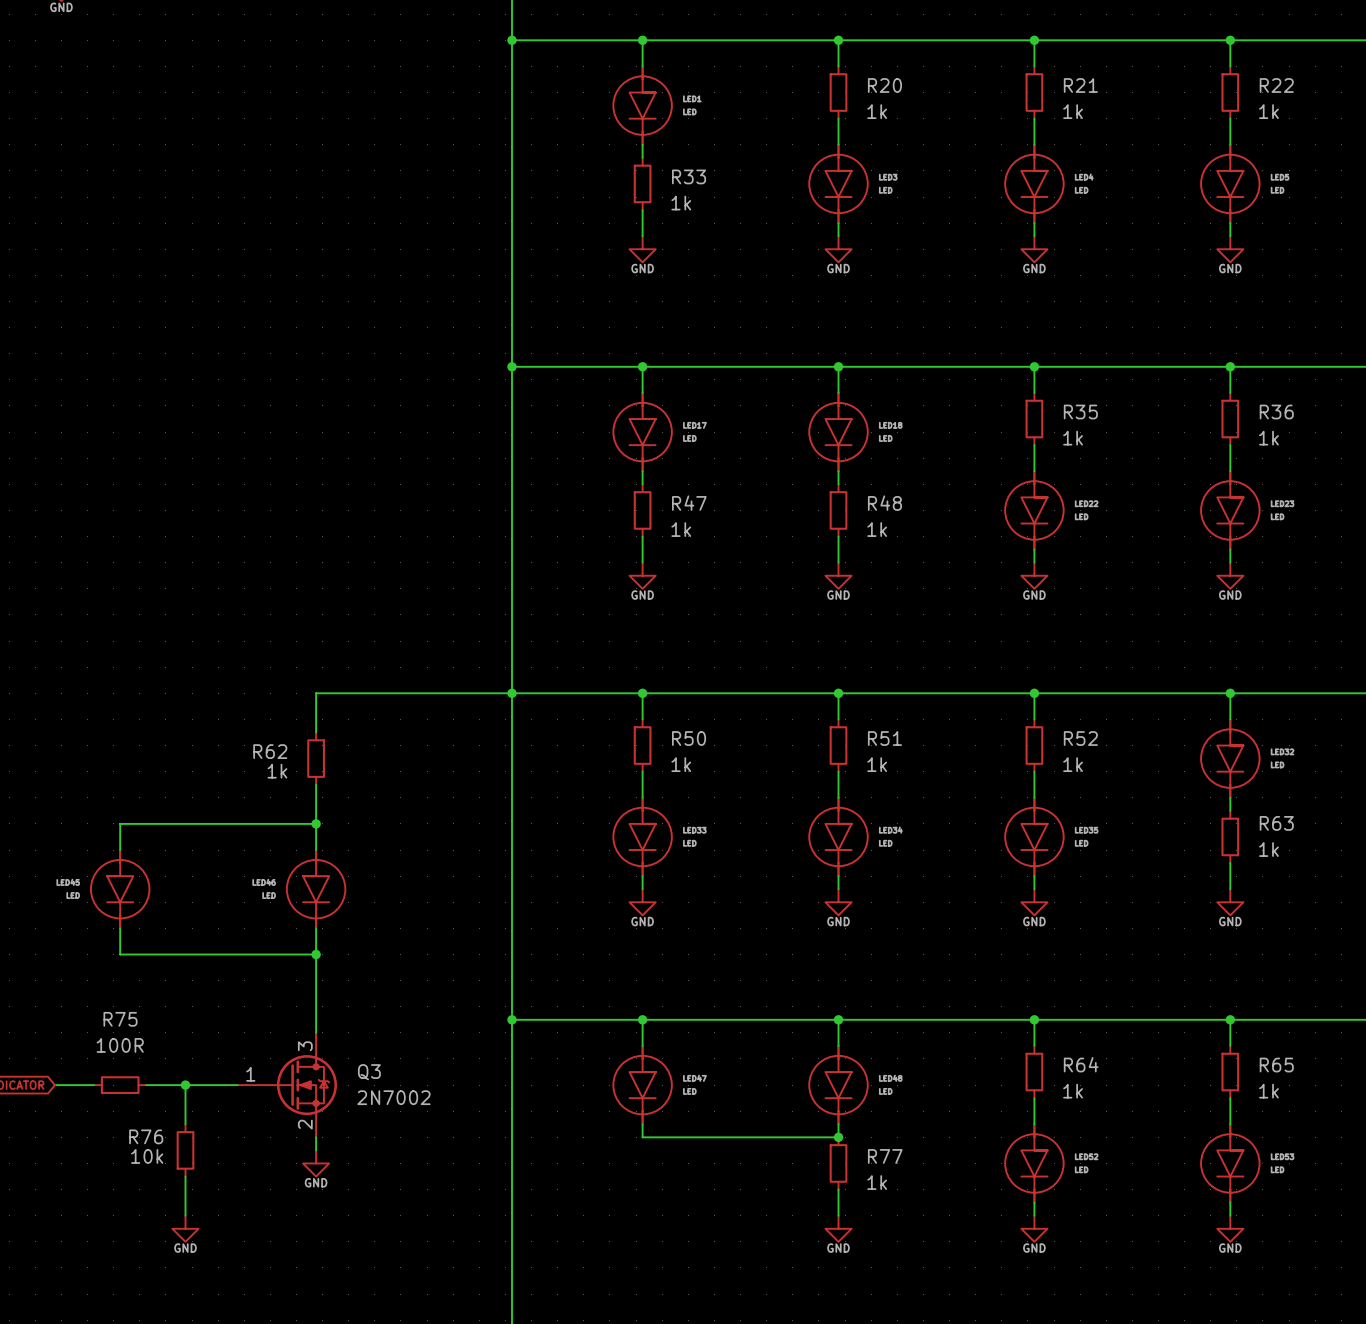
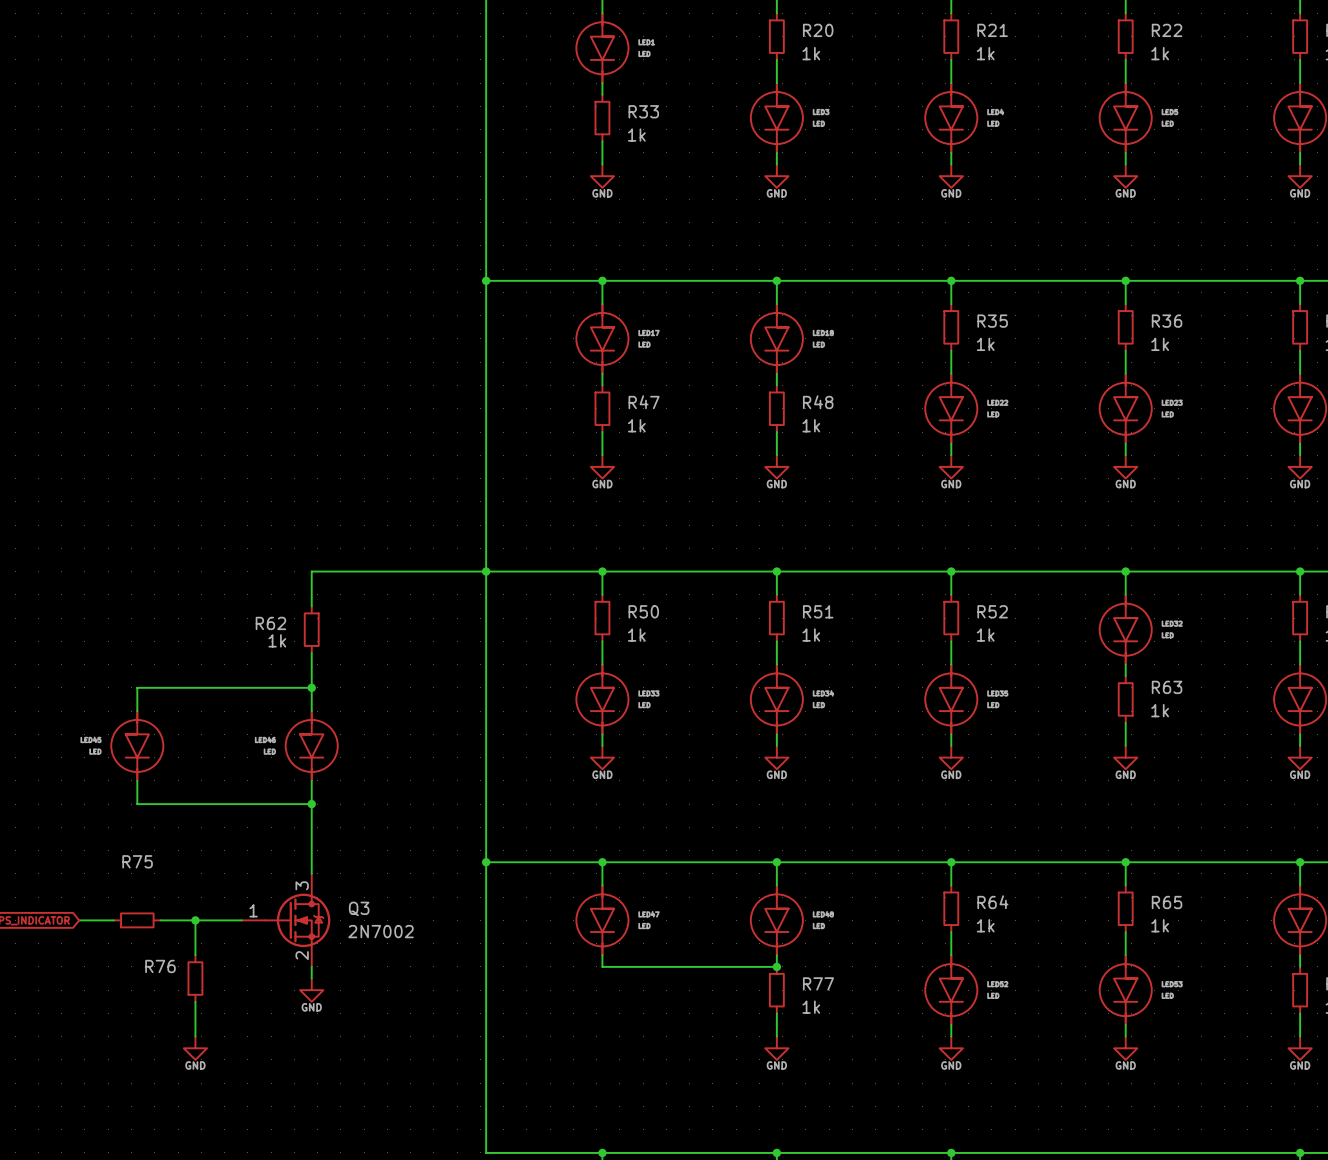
R75 value: 100R (120, 1045) -> none
R76 value: 10k (147, 1156) -> none

